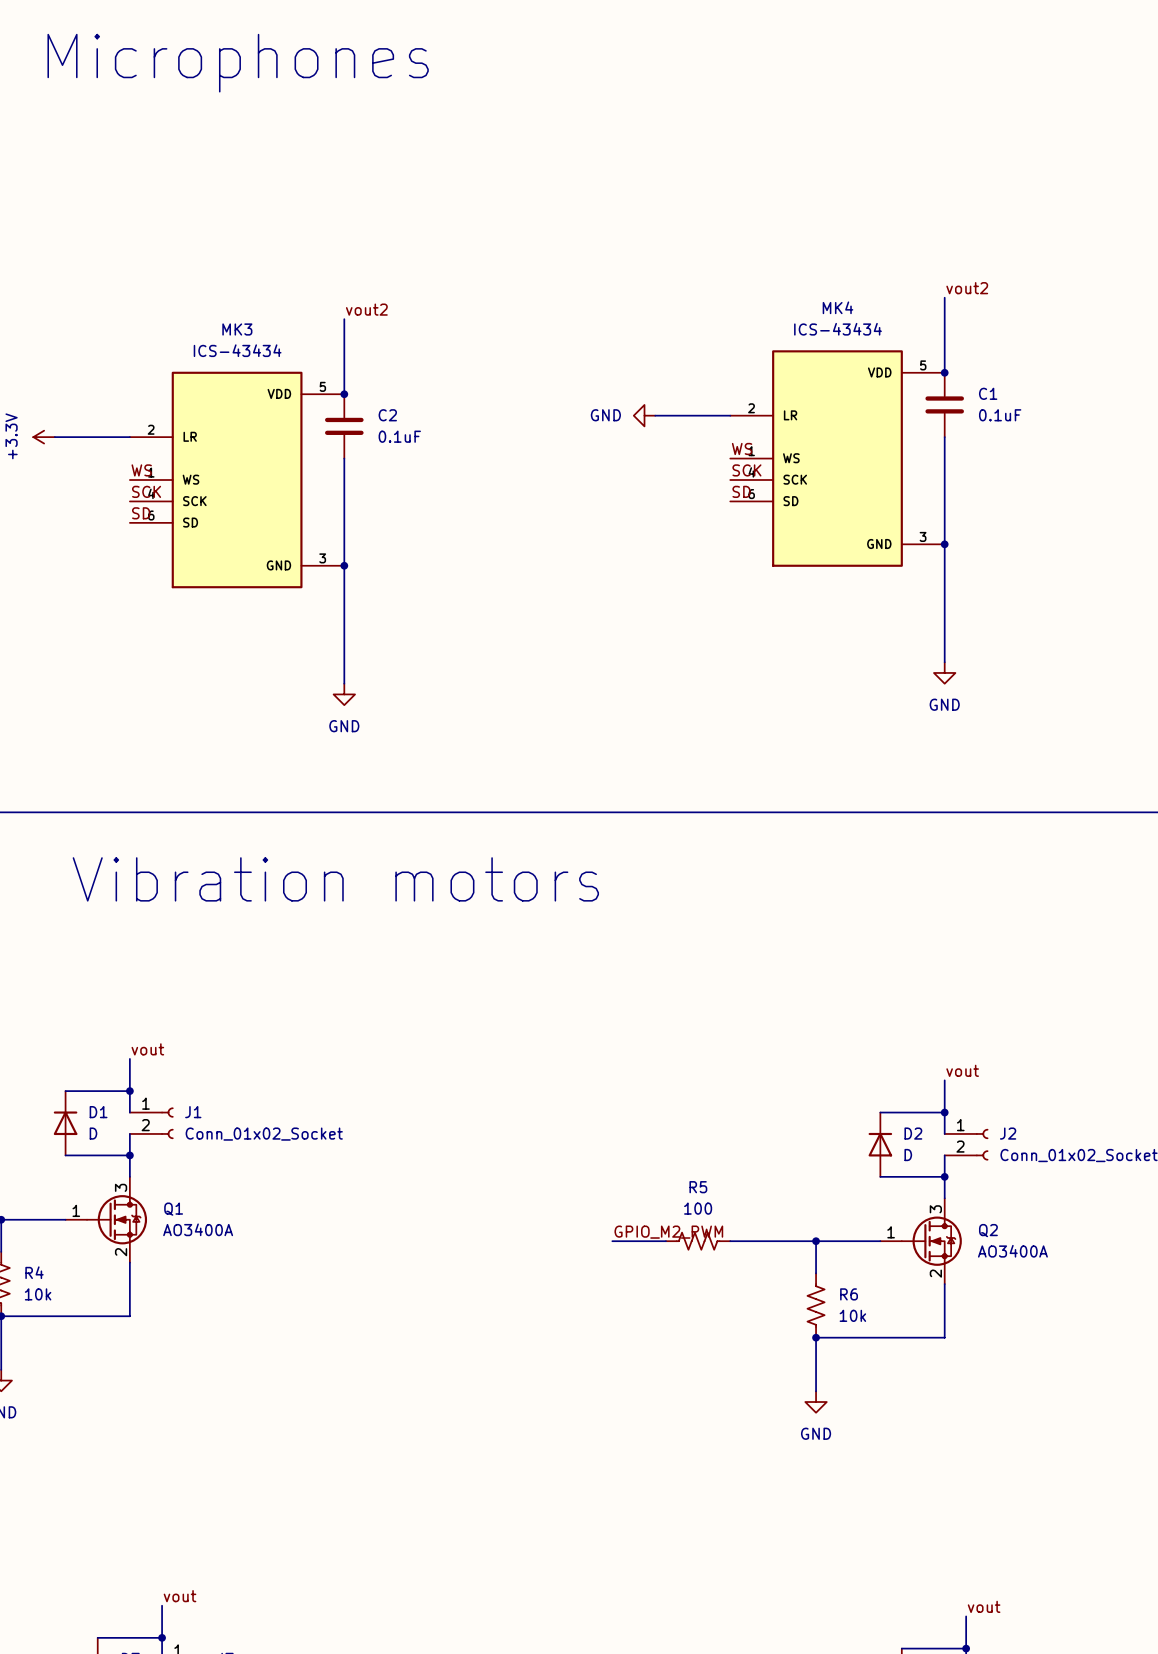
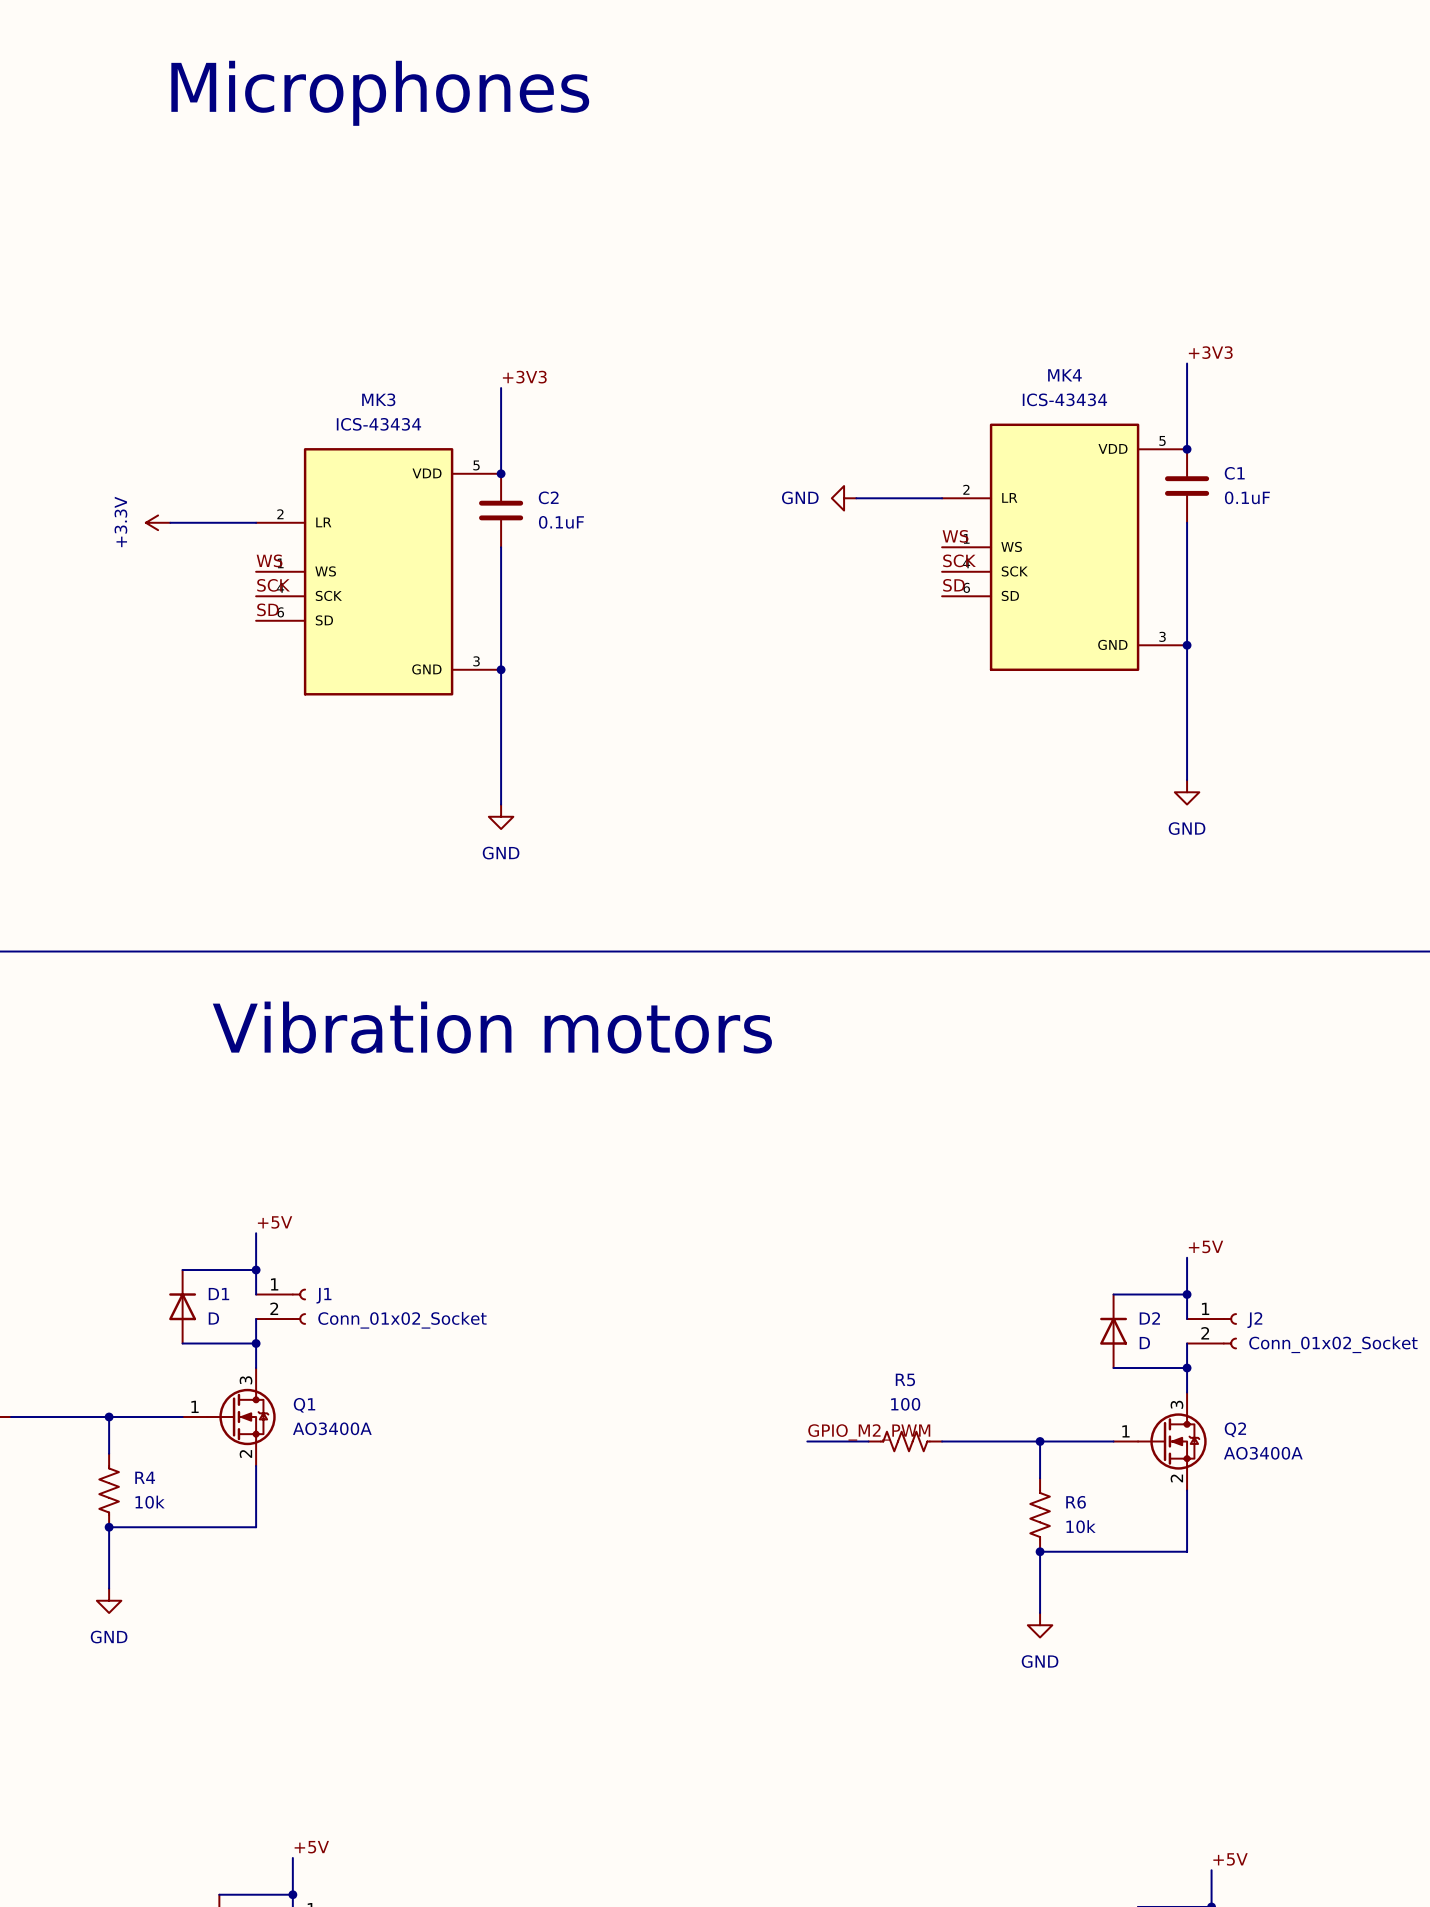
label: vout2 (967, 288) -> +3V3 (1210, 352)
label: vout2 (366, 309) -> +3V3 (524, 377)
label: vout (147, 1049) -> +5V (275, 1222)
label: vout (962, 1070) -> +5V (1206, 1246)
label: vout (180, 1596) -> +5V (311, 1847)
label: vout (984, 1606) -> +5V (1230, 1859)

